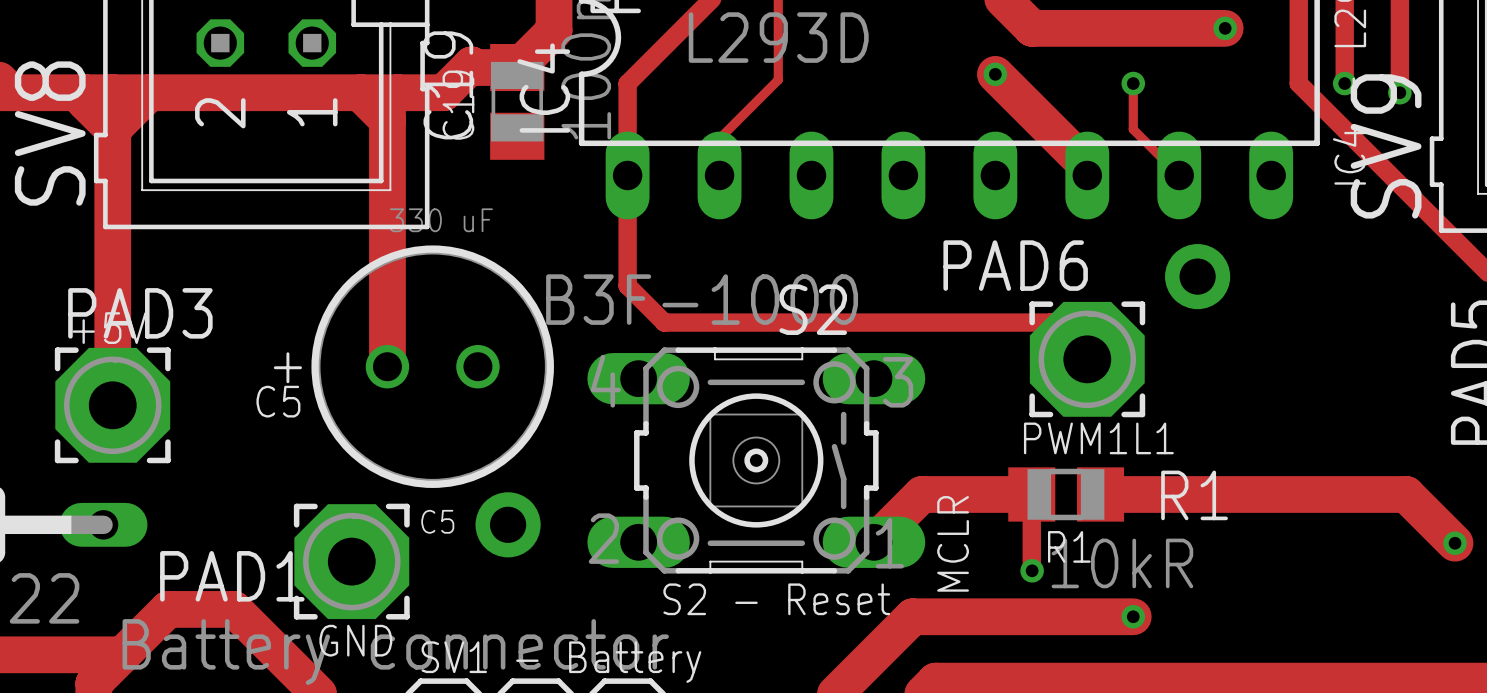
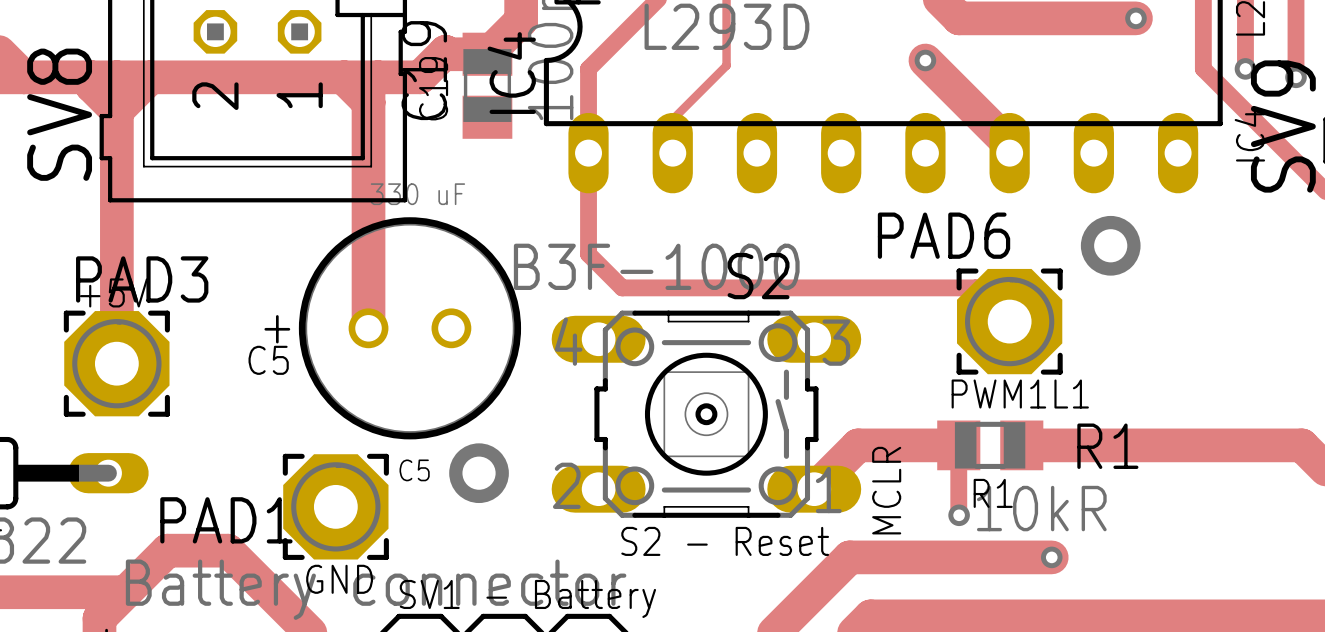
track: (1133, 83) (1133, 129) (1179, 175) -> none
via: (1133, 83) -> none

